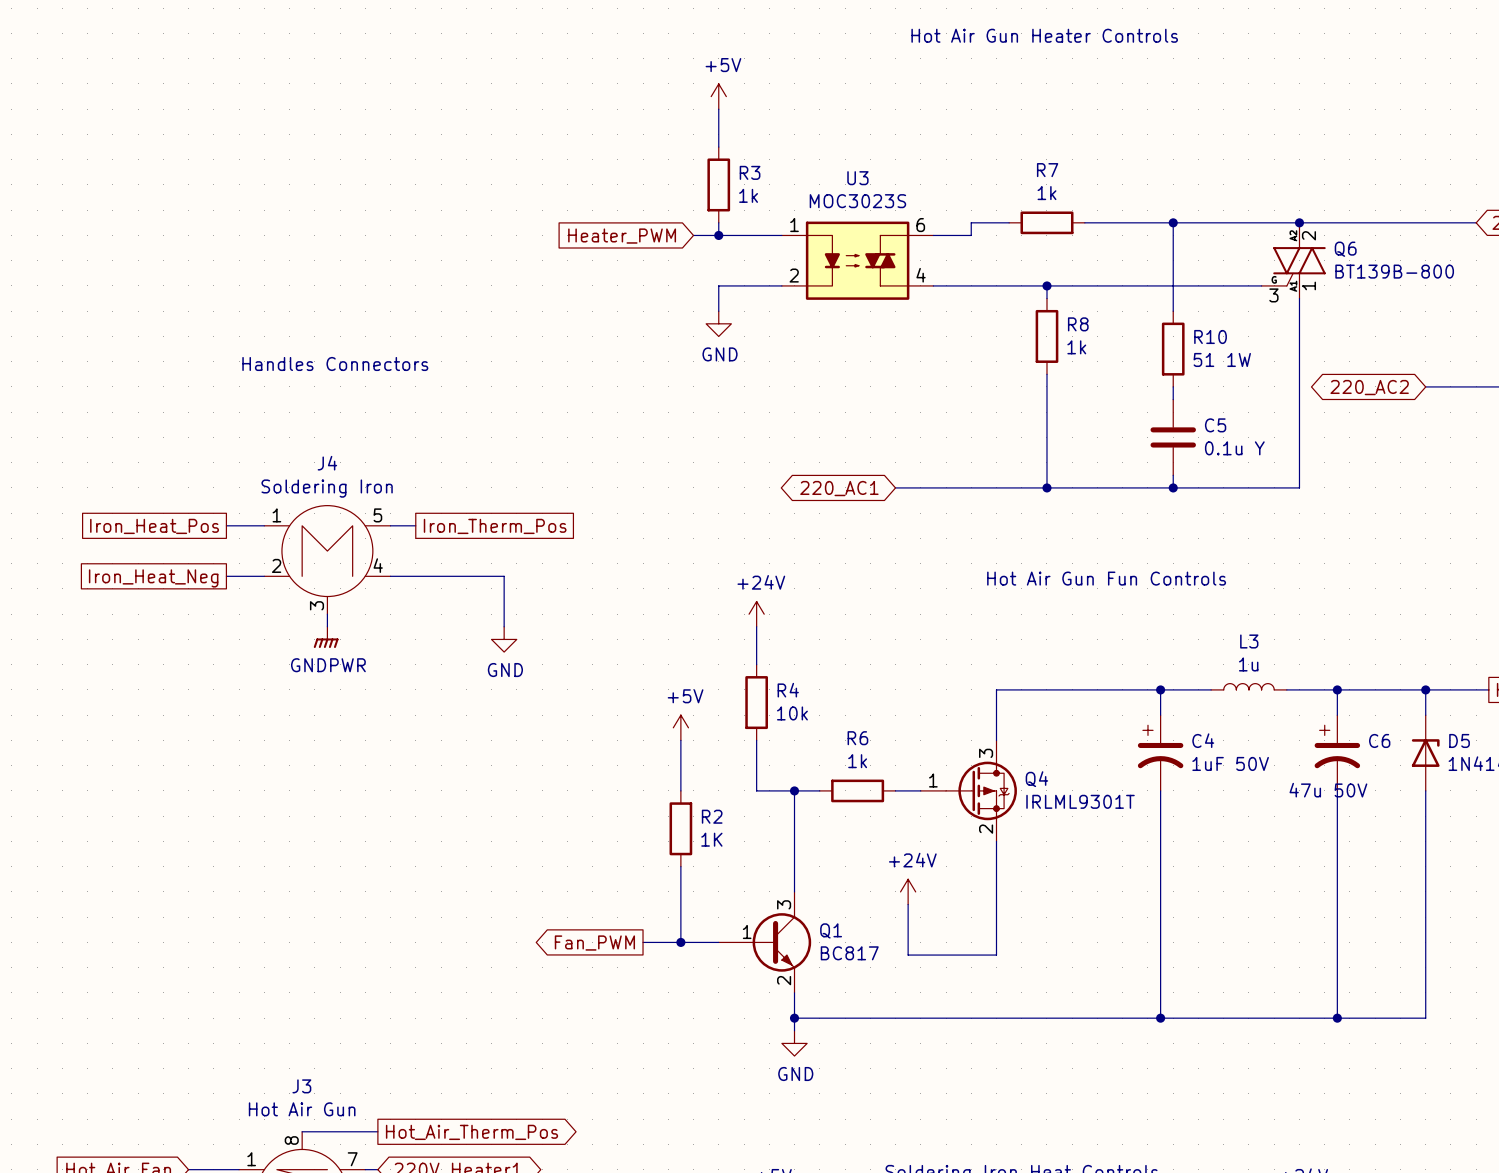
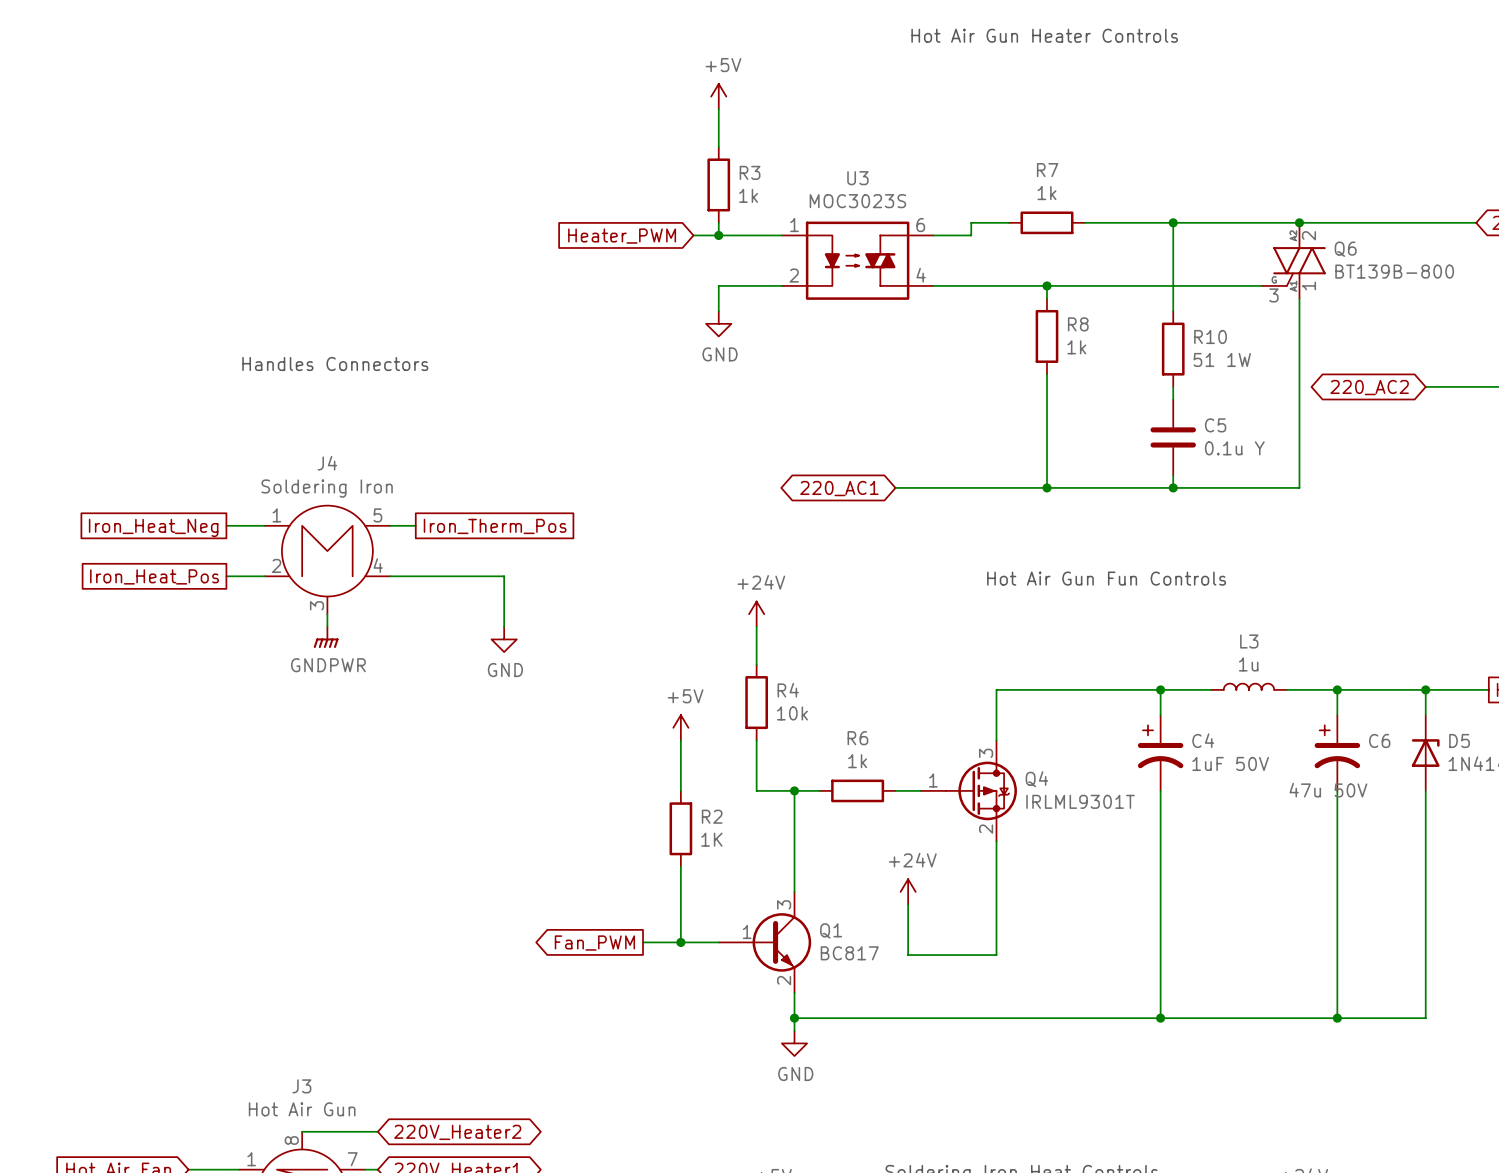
global label: Iron_Heat_Pos (154, 526) -> Iron_Heat_Neg (153, 527)
global label: Iron_Heat_Neg (153, 578) -> Iron_Heat_Pos (154, 576)
global label shape: output (472, 1132) -> bidirectional (457, 1132)
global label: Hot_Air_Therm_Pos (472, 1132) -> 220V_Heater2 (457, 1132)

